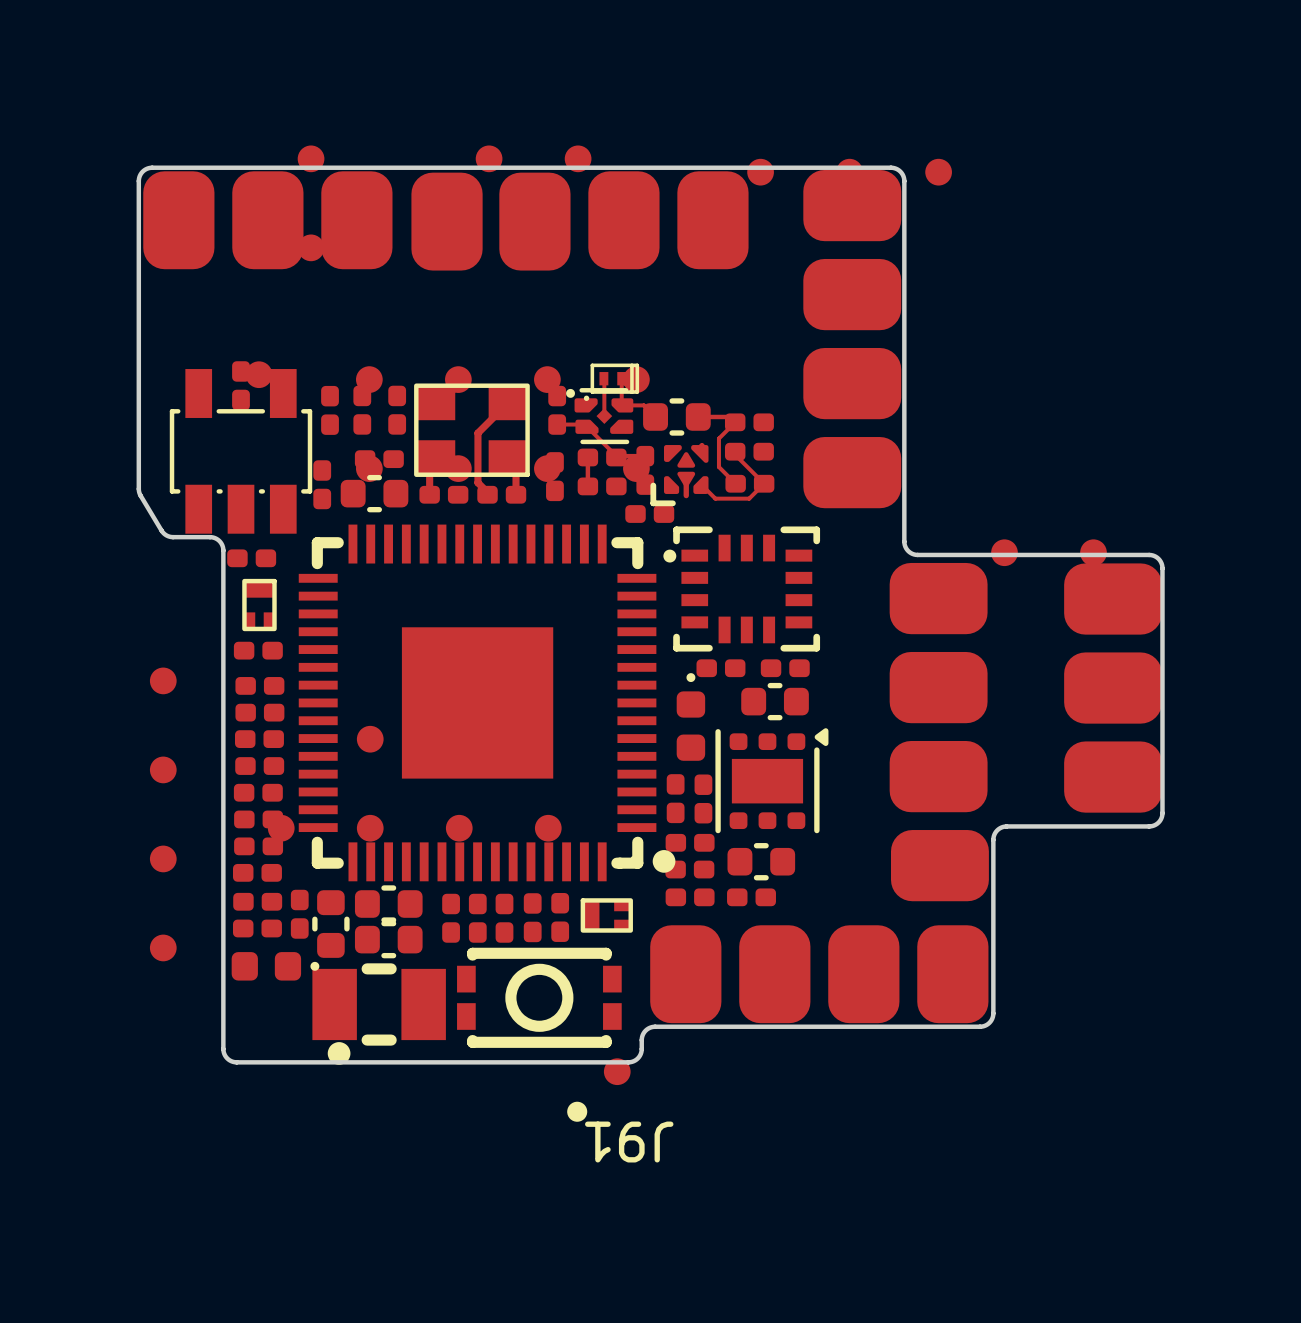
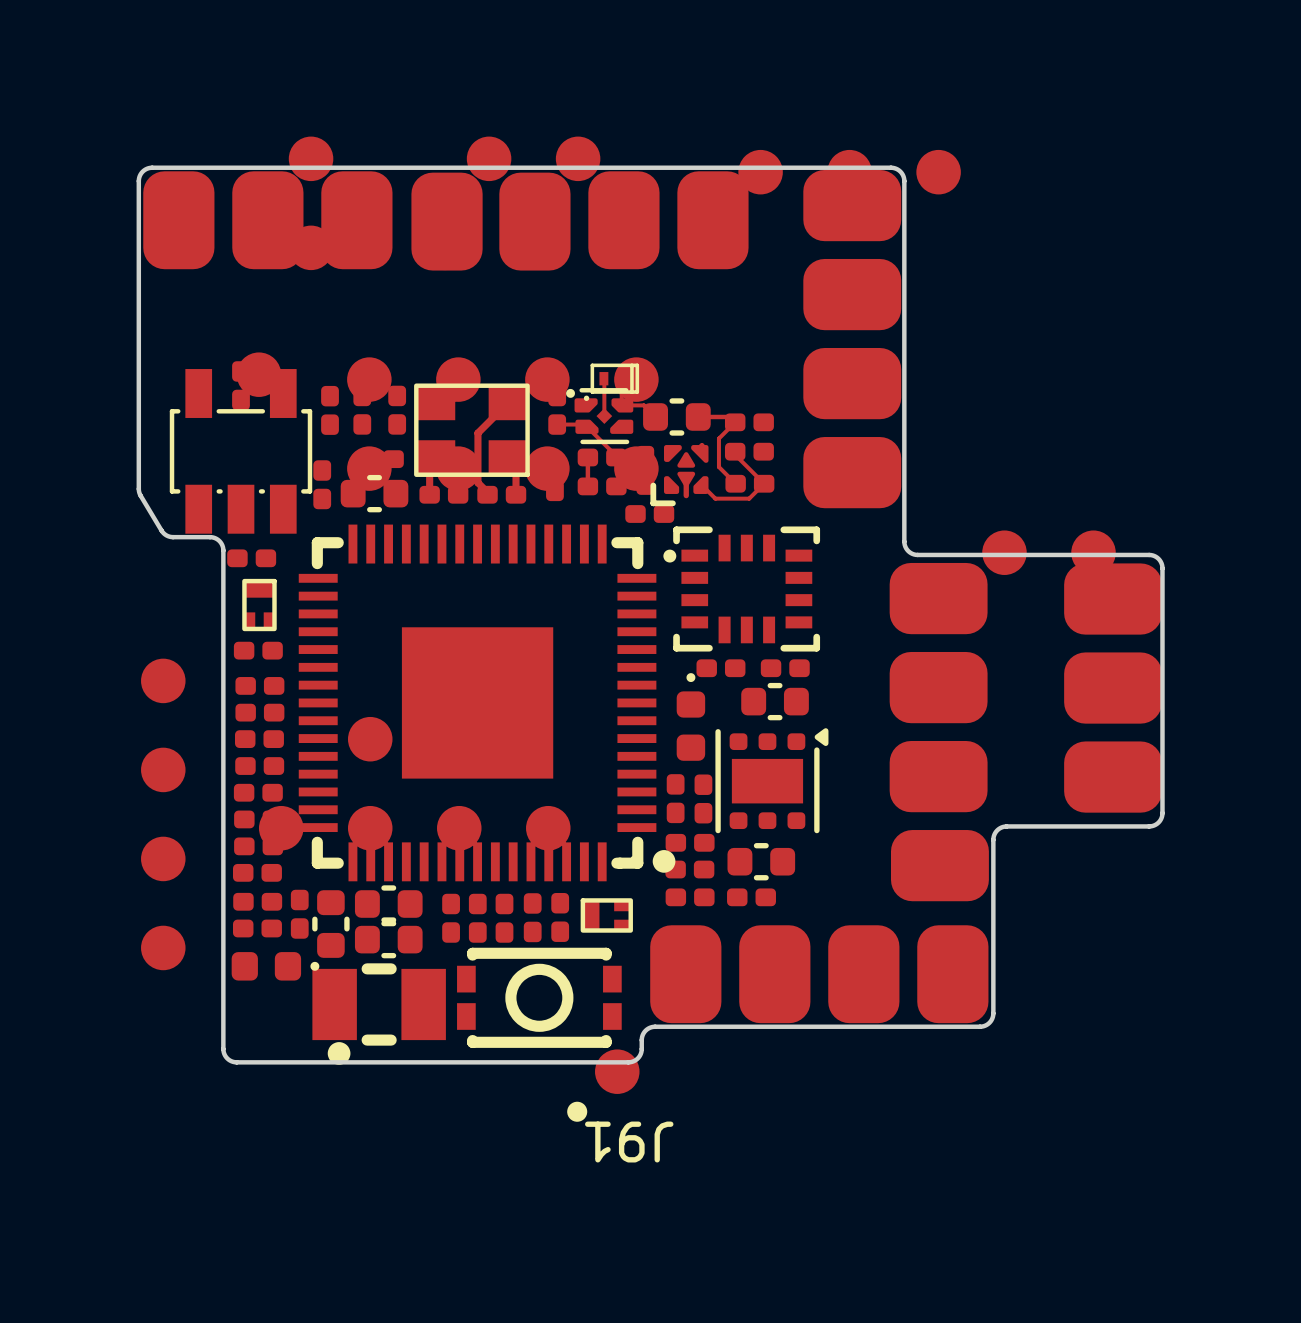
J91 footprint: [149, 145, 1107, 1122] -> [141, 136, 1116, 1122]

